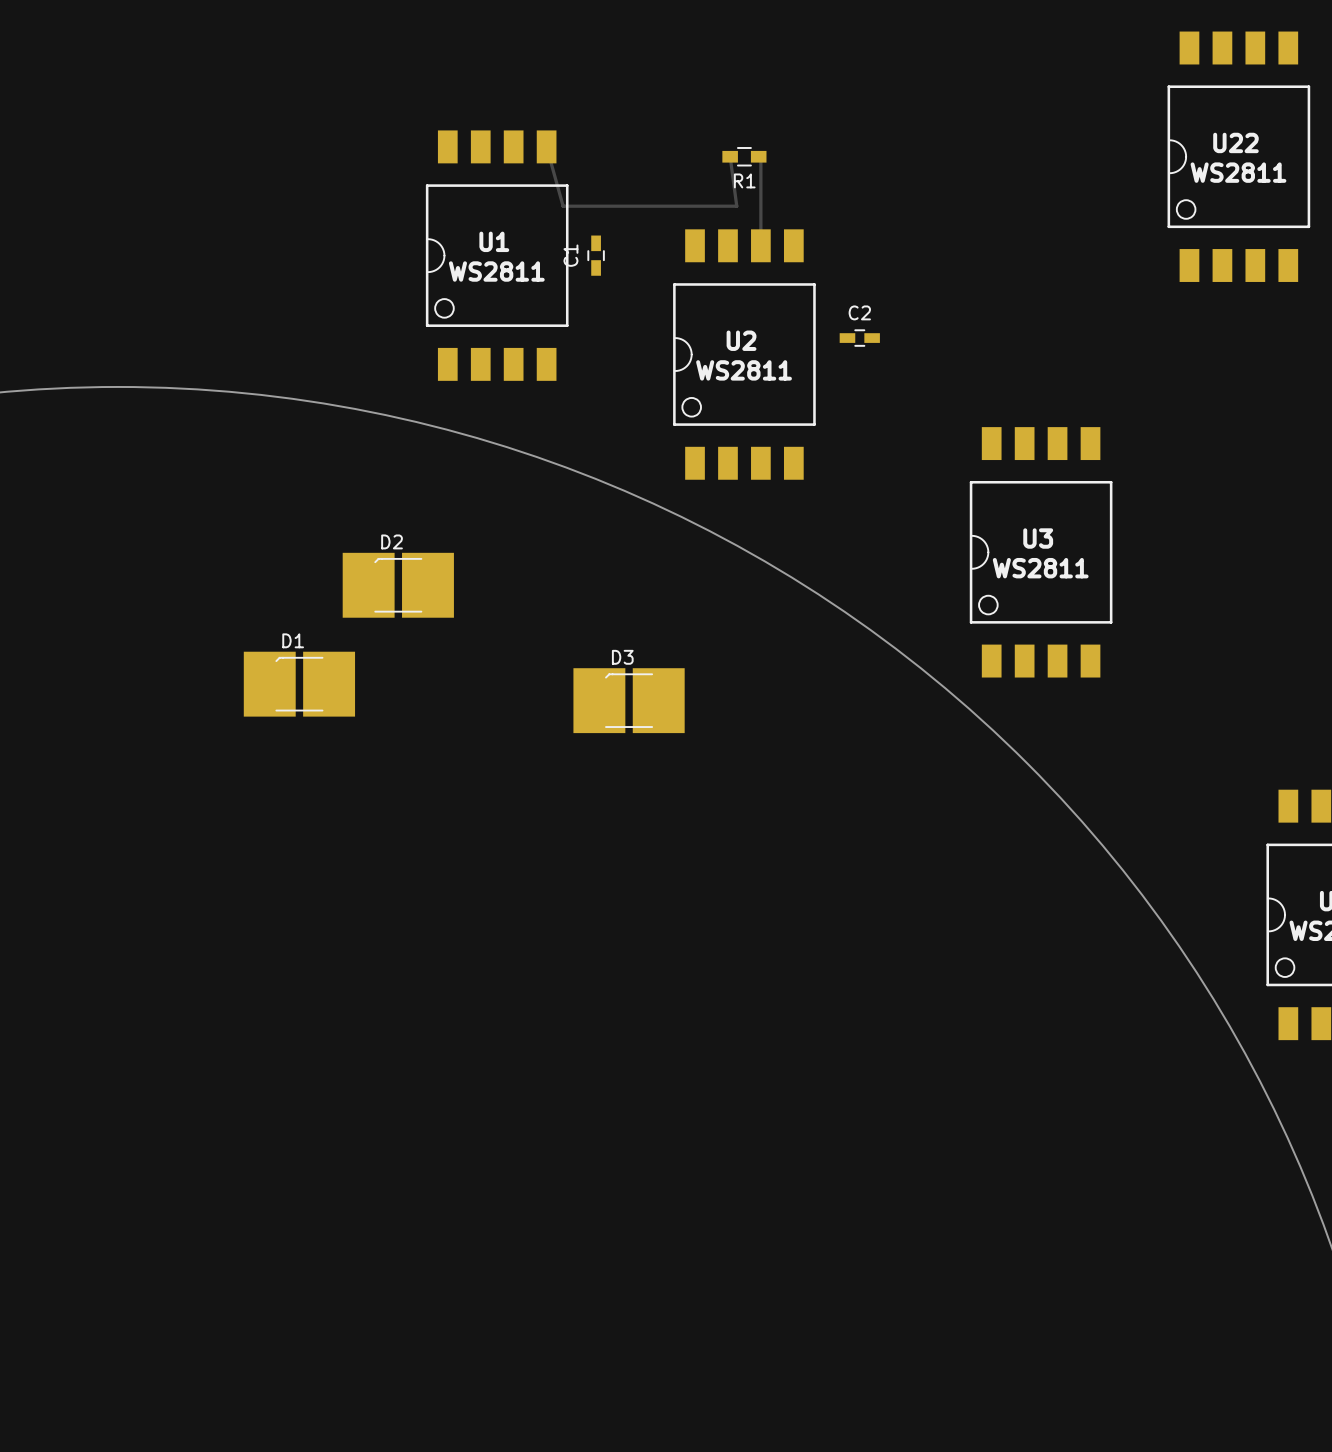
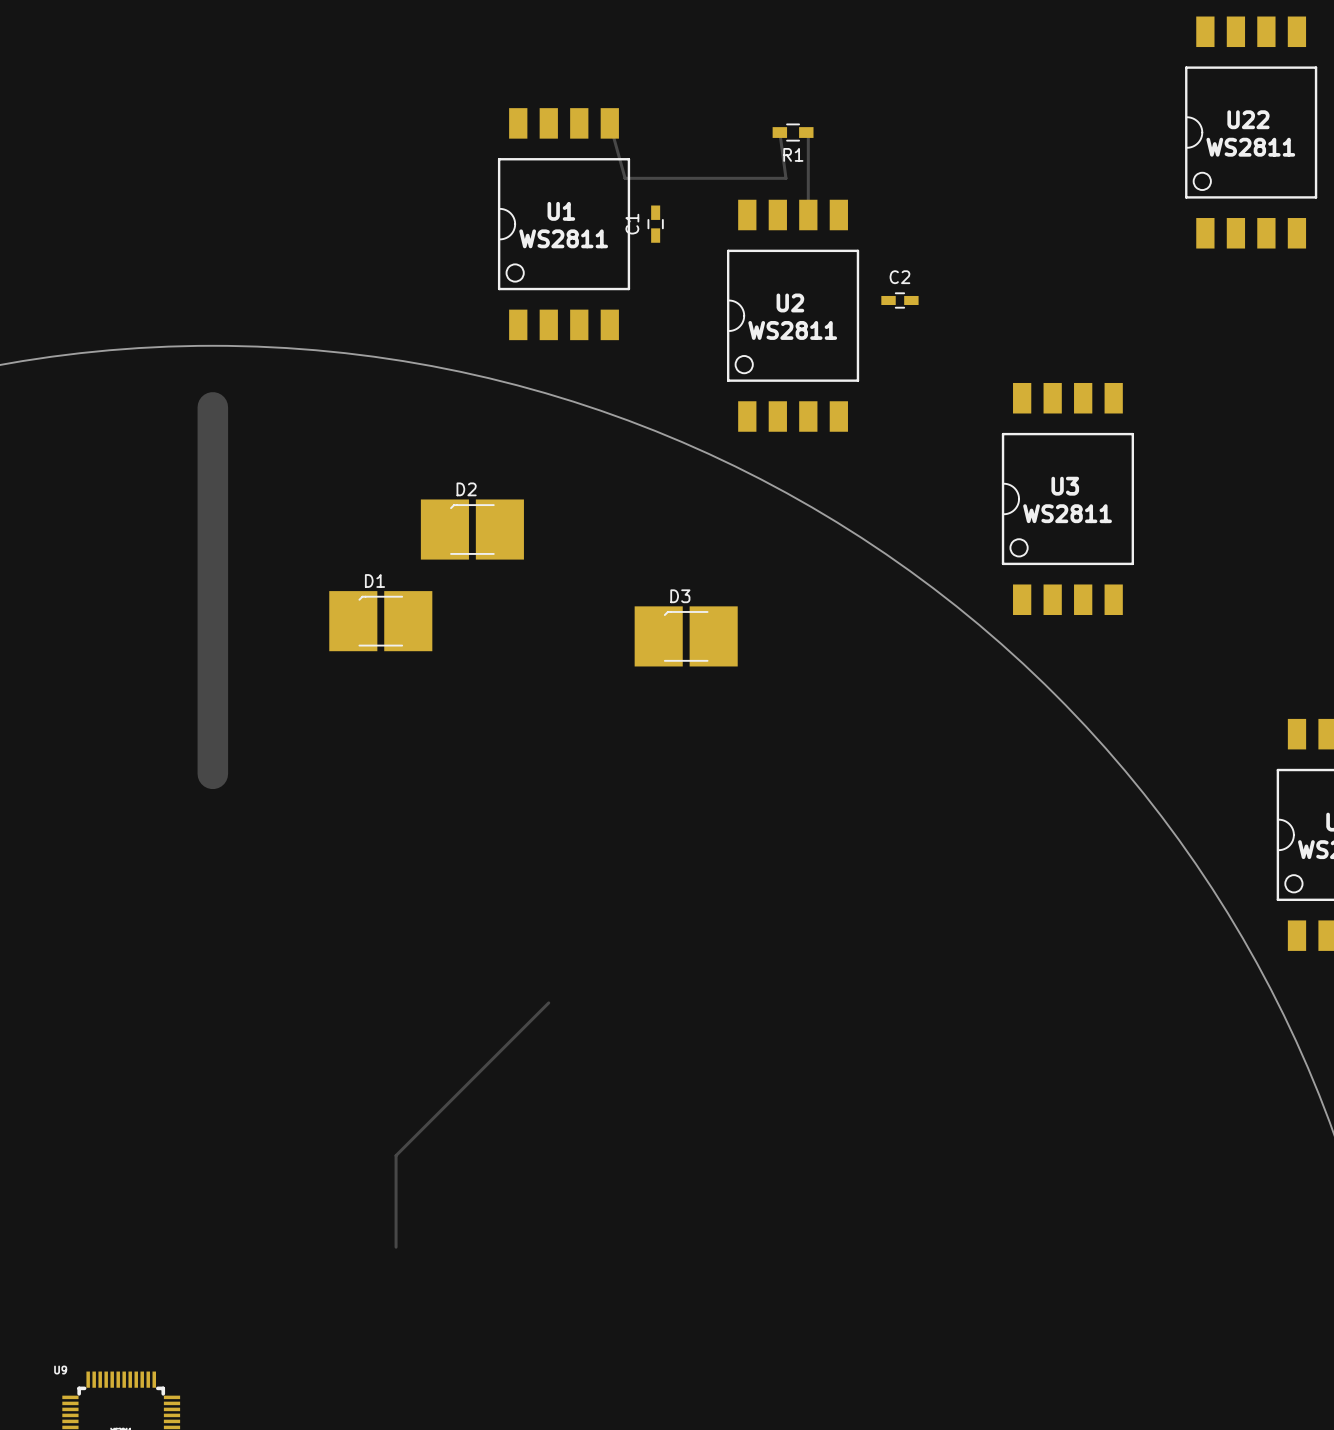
track: none -> (212, 407) (212, 773)
track: none -> (548, 1002) (396, 1155) (396, 1247)

